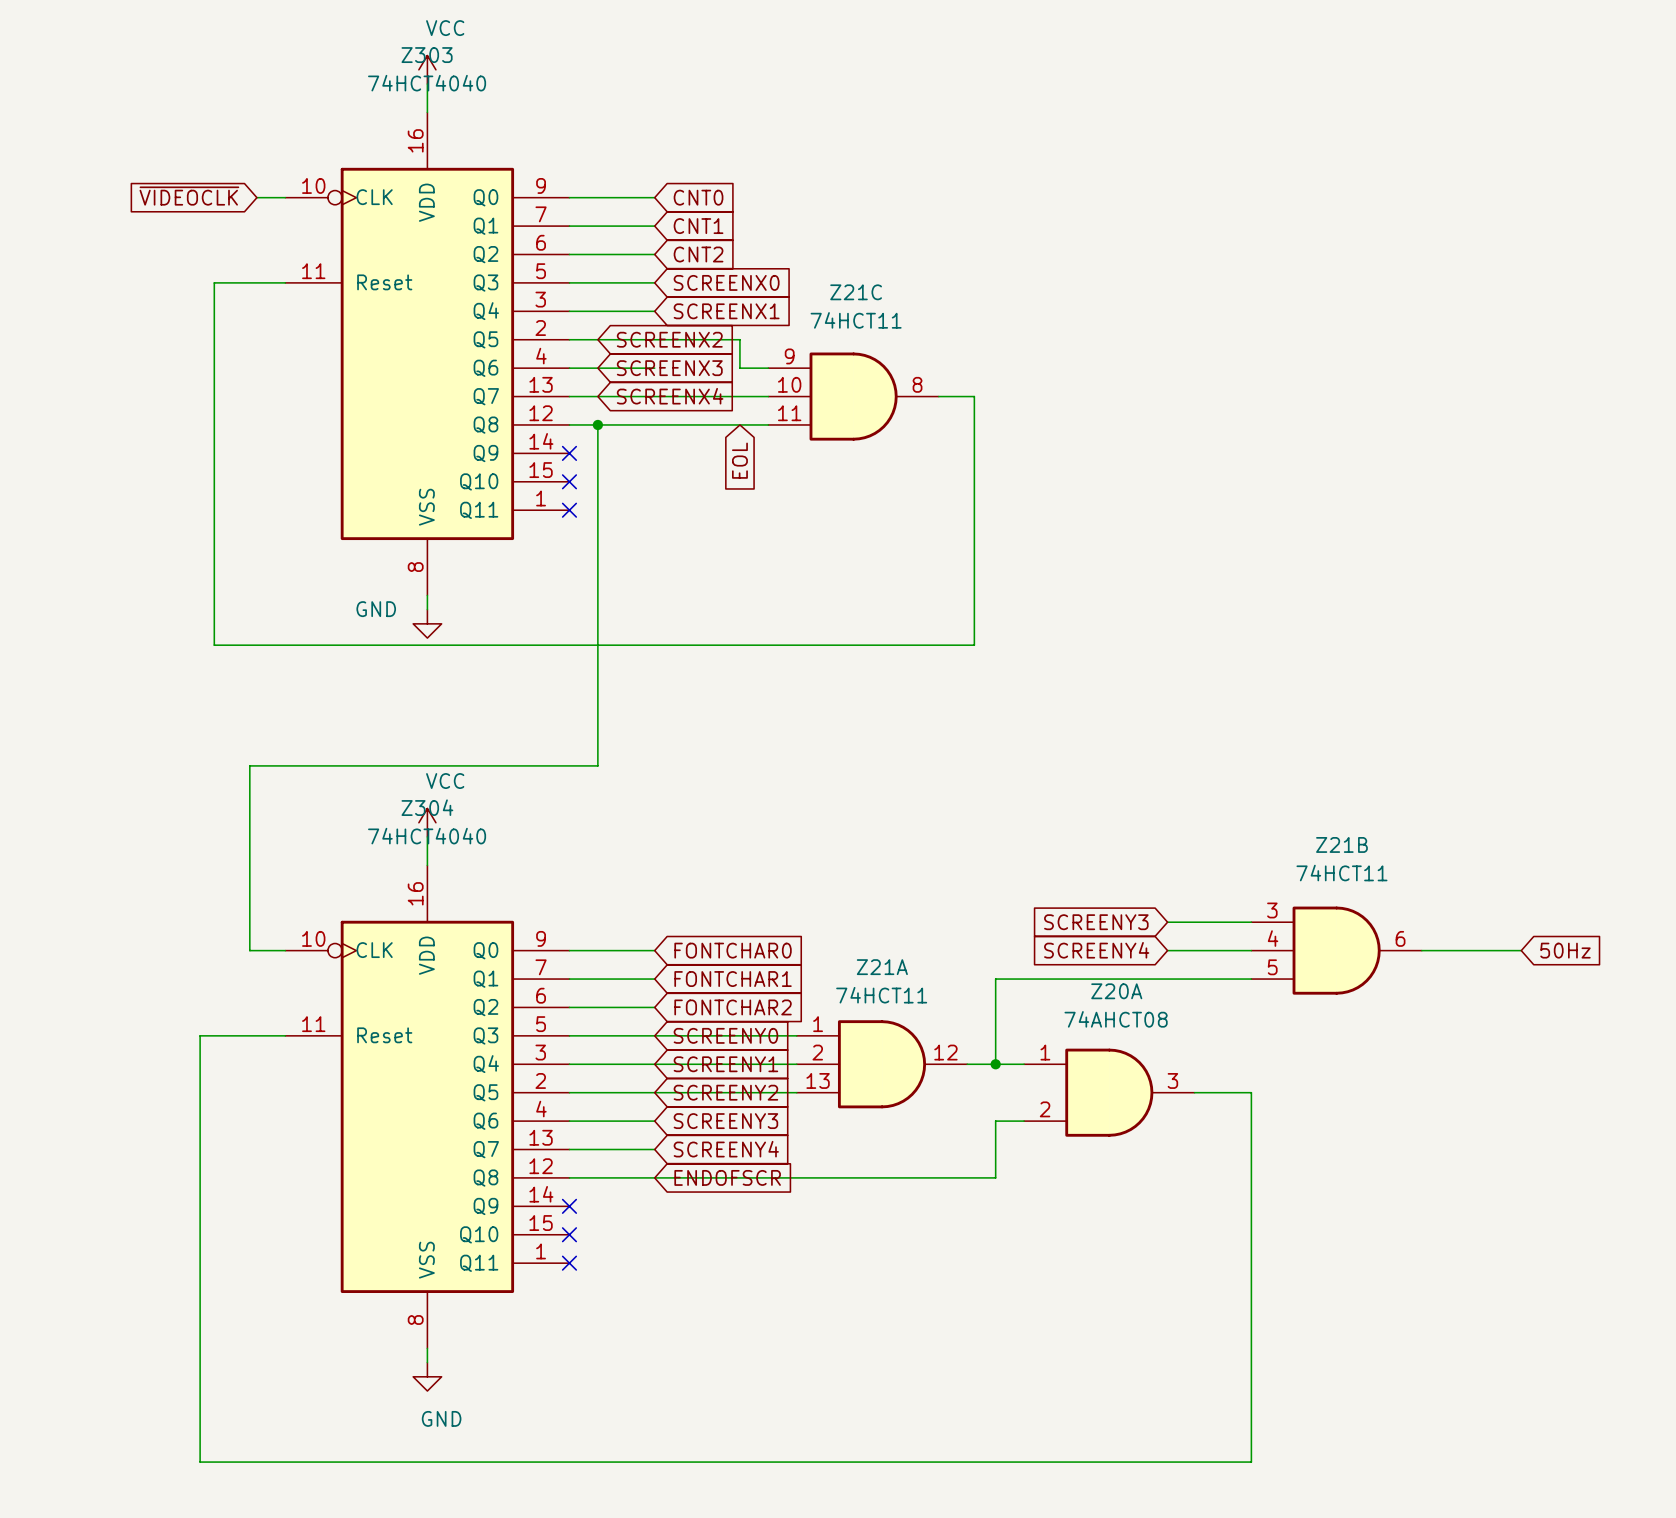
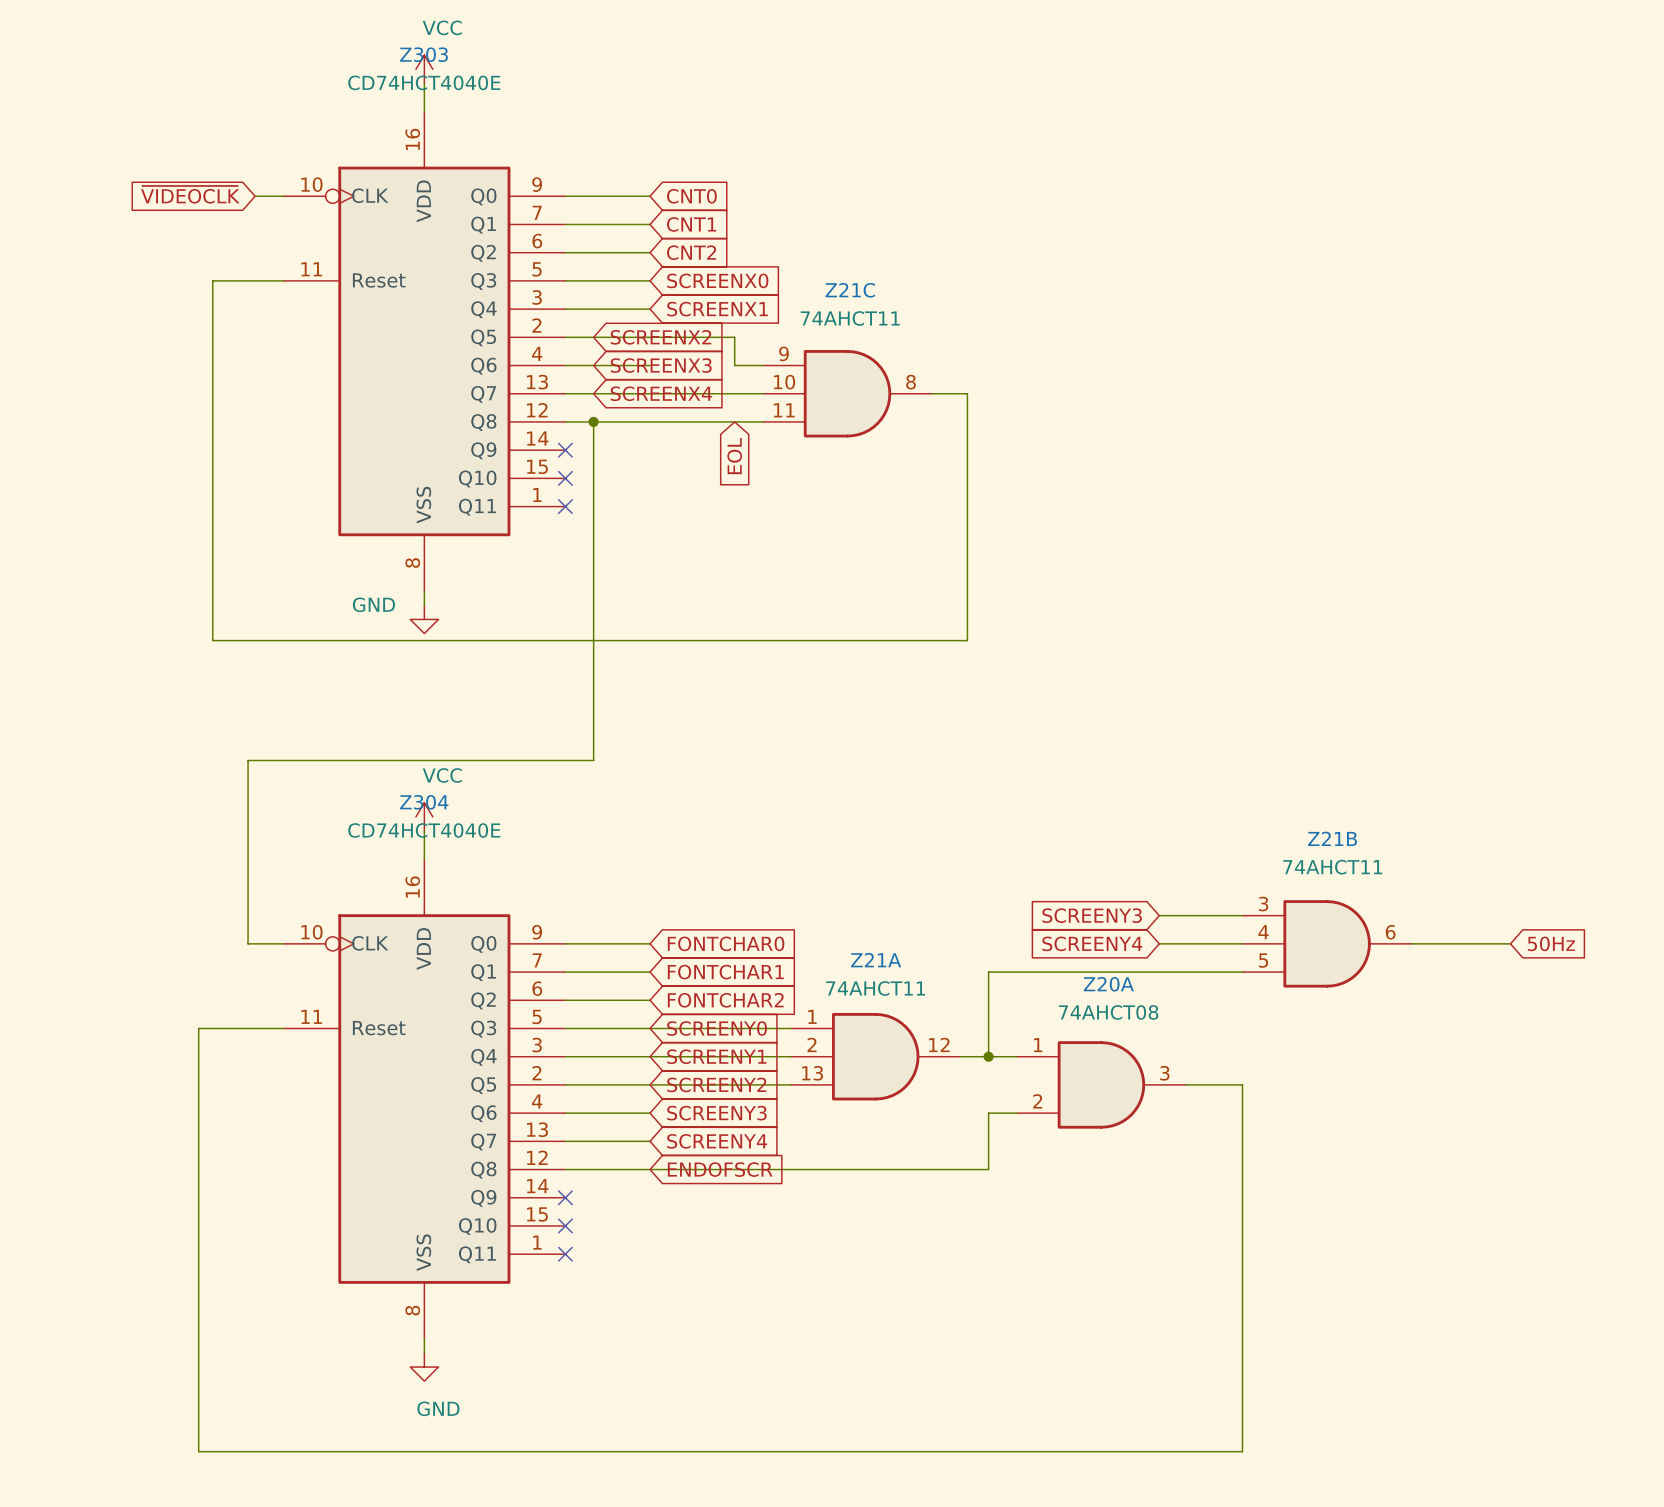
Z303 value: 74HCT4040 (427, 83) -> CD74HCT4040E (424, 82)
Z21C value: 74HCT11 (856, 320) -> 74AHCT11 (850, 318)
Z304 value: 74HCT4040 (427, 836) -> CD74HCT4040E (424, 830)
Z21B value: 74HCT11 (1341, 873) -> 74AHCT11 (1332, 867)
Z21A value: 74HCT11 (881, 995) -> 74AHCT11 (875, 988)

